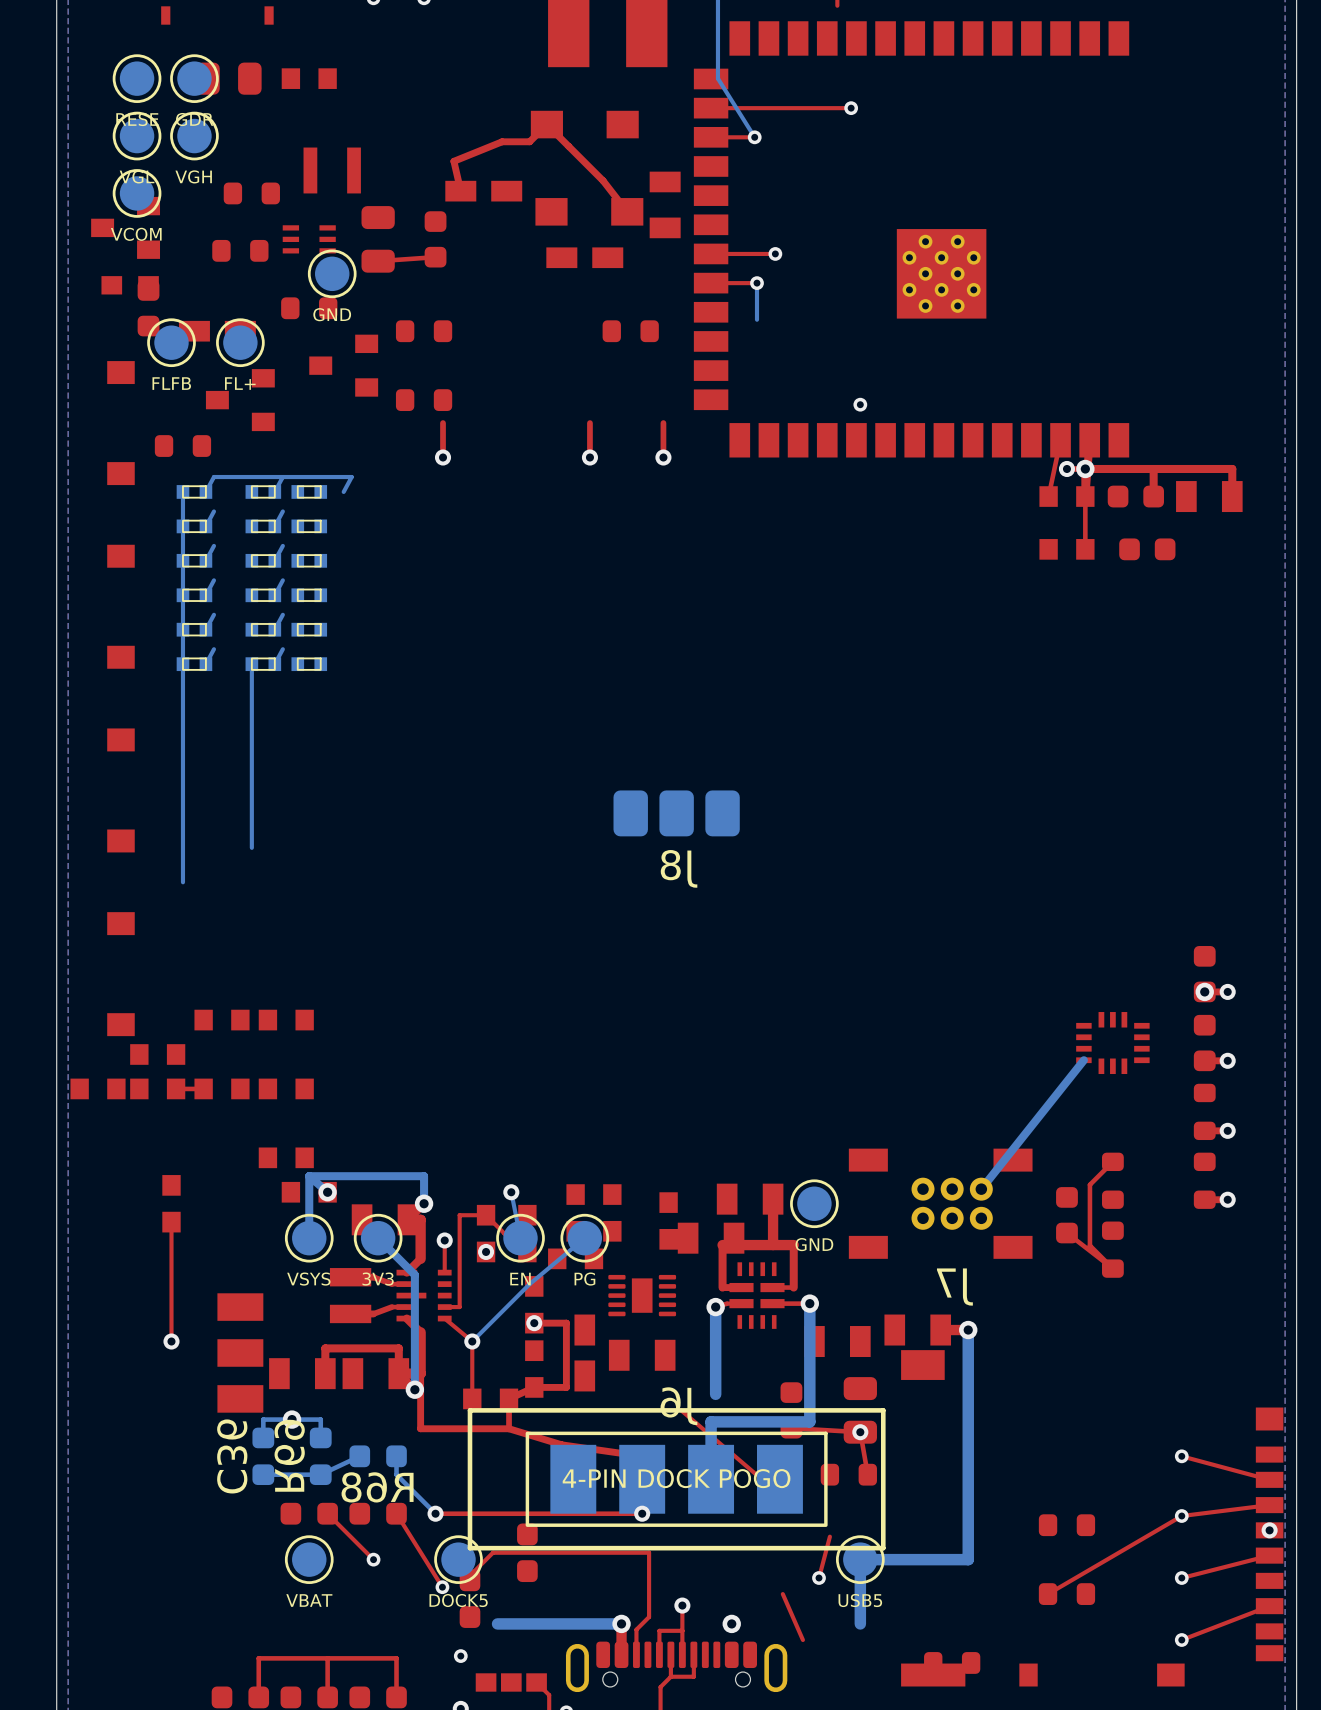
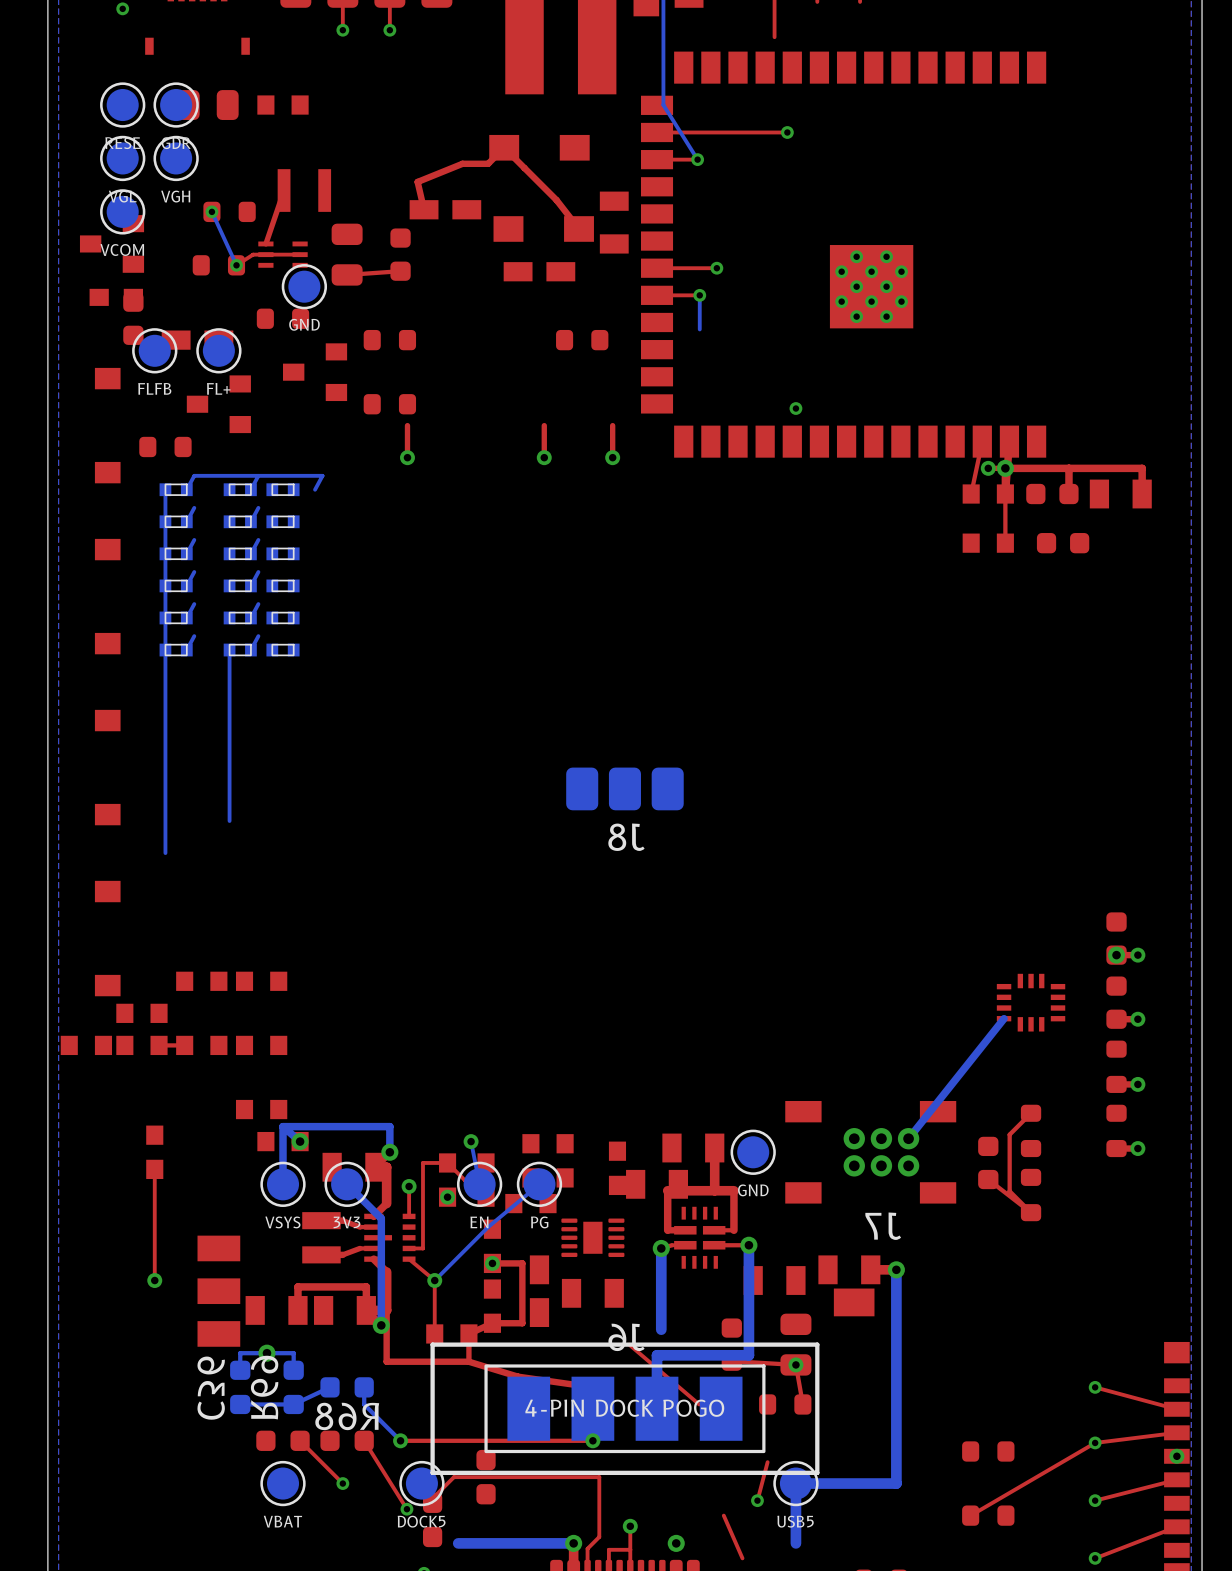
top track: none -> (284, 190) (265, 243)
bottom track: none -> (211, 211) (236, 265)
via: none -> (211, 211)
top track: none -> (300, 254) (253, 254) (236, 265)
via: none -> (236, 265)

